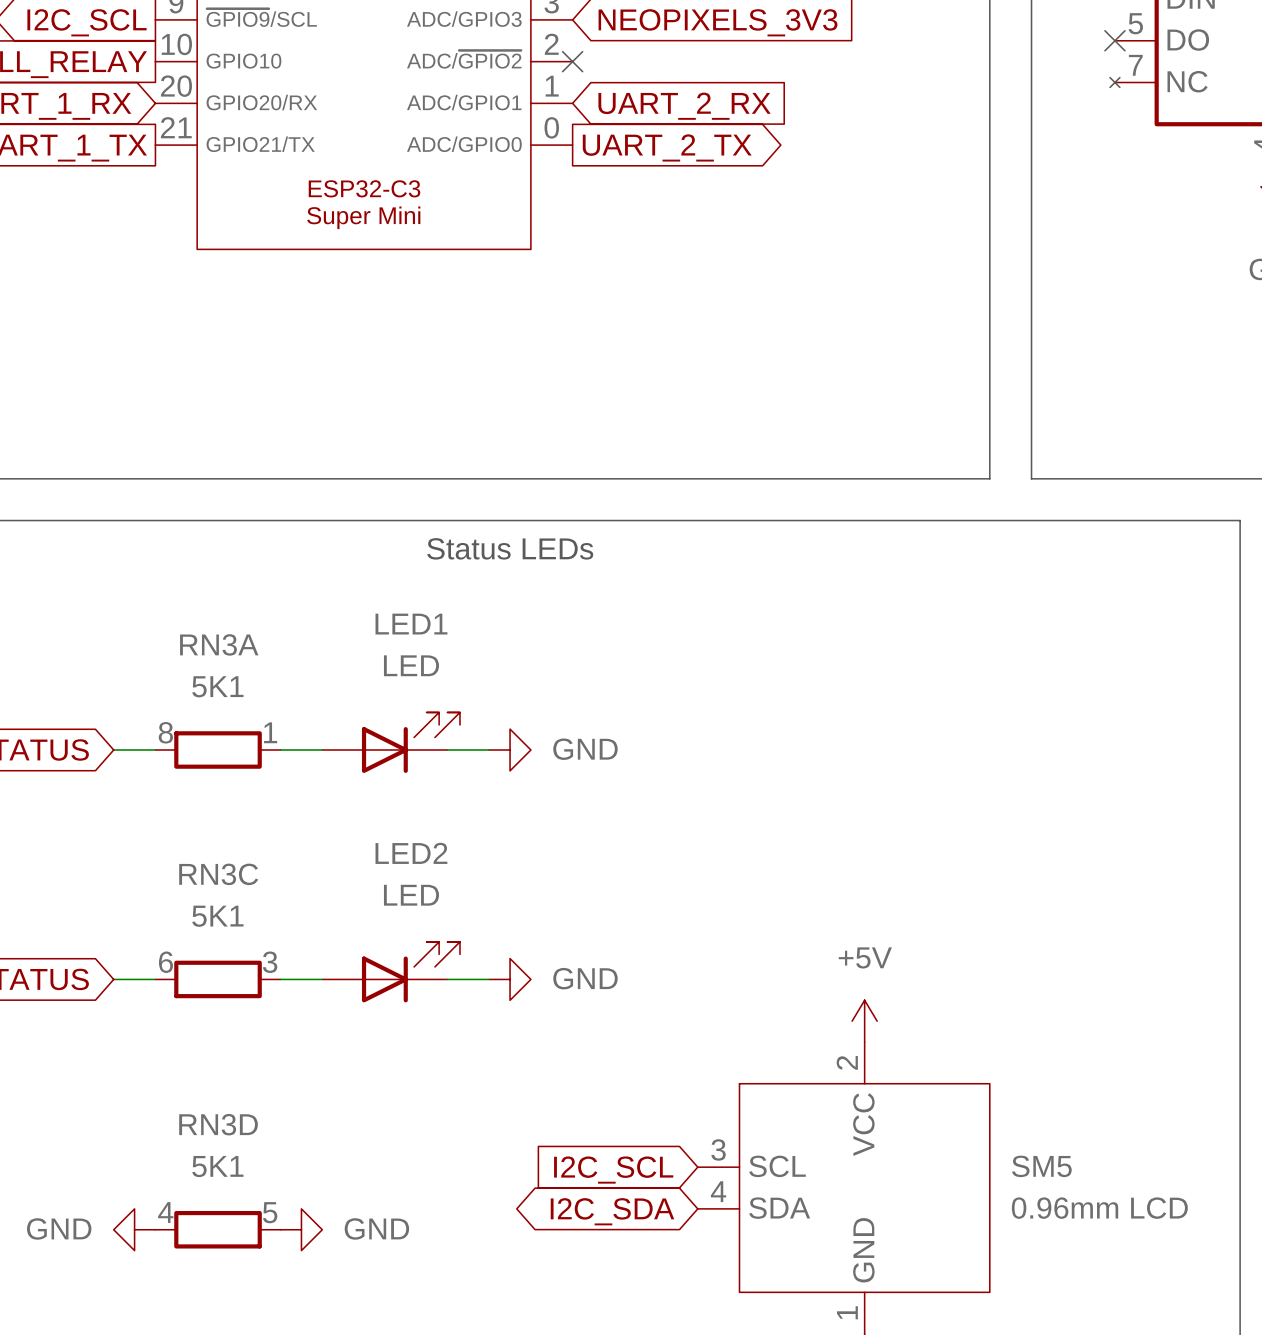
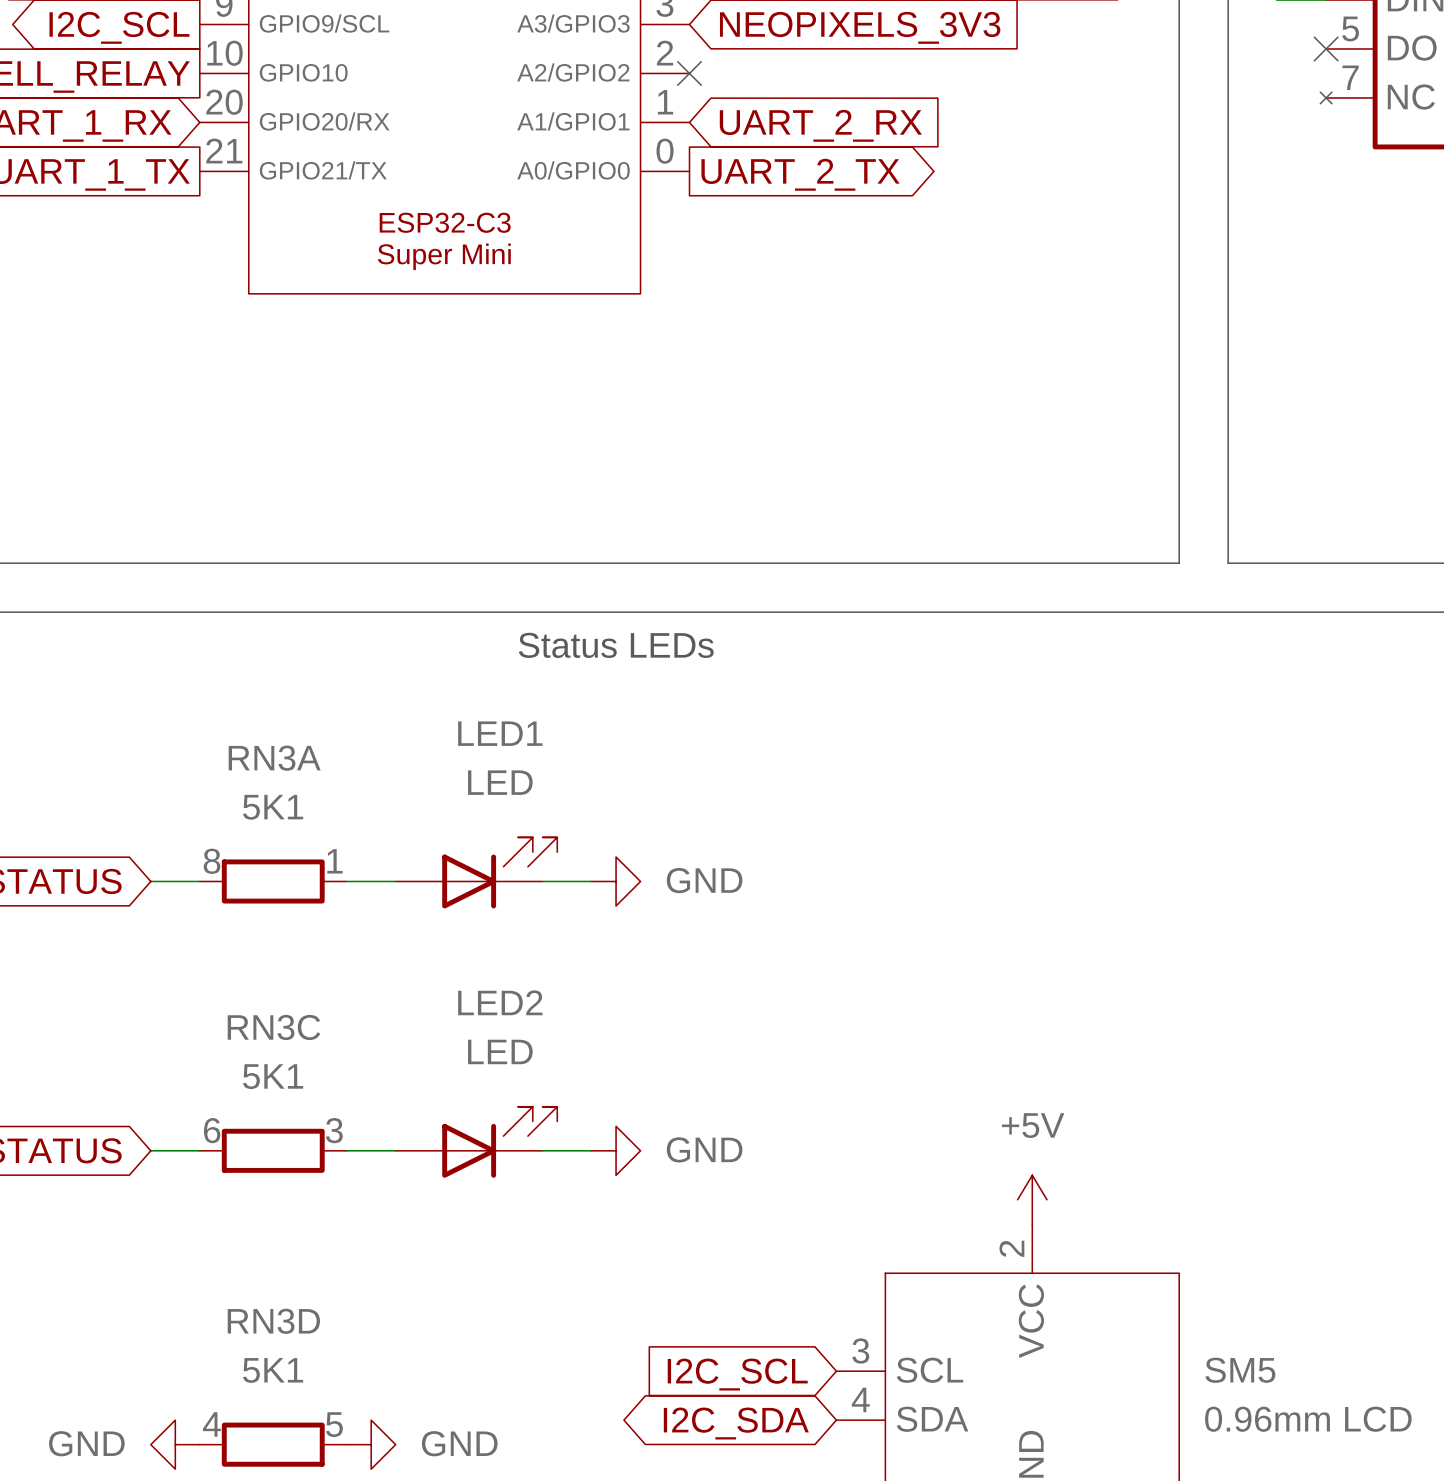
part pin name: ~{GPIO9}/SCL (261, 17) -> GPIO9/SCL (324, 23)
part pin name: ADC/GPIO3 (464, 19) -> A3/GPIO3 (573, 23)
part pin name: ADC/~{GPIO2} (464, 59) -> A2/GPIO2 (573, 72)
part pin name: ADC/GPIO1 (464, 102) -> A1/GPIO1 (573, 121)
part pin name: ADC/GPIO0 (464, 144) -> A0/GPIO0 (573, 170)

